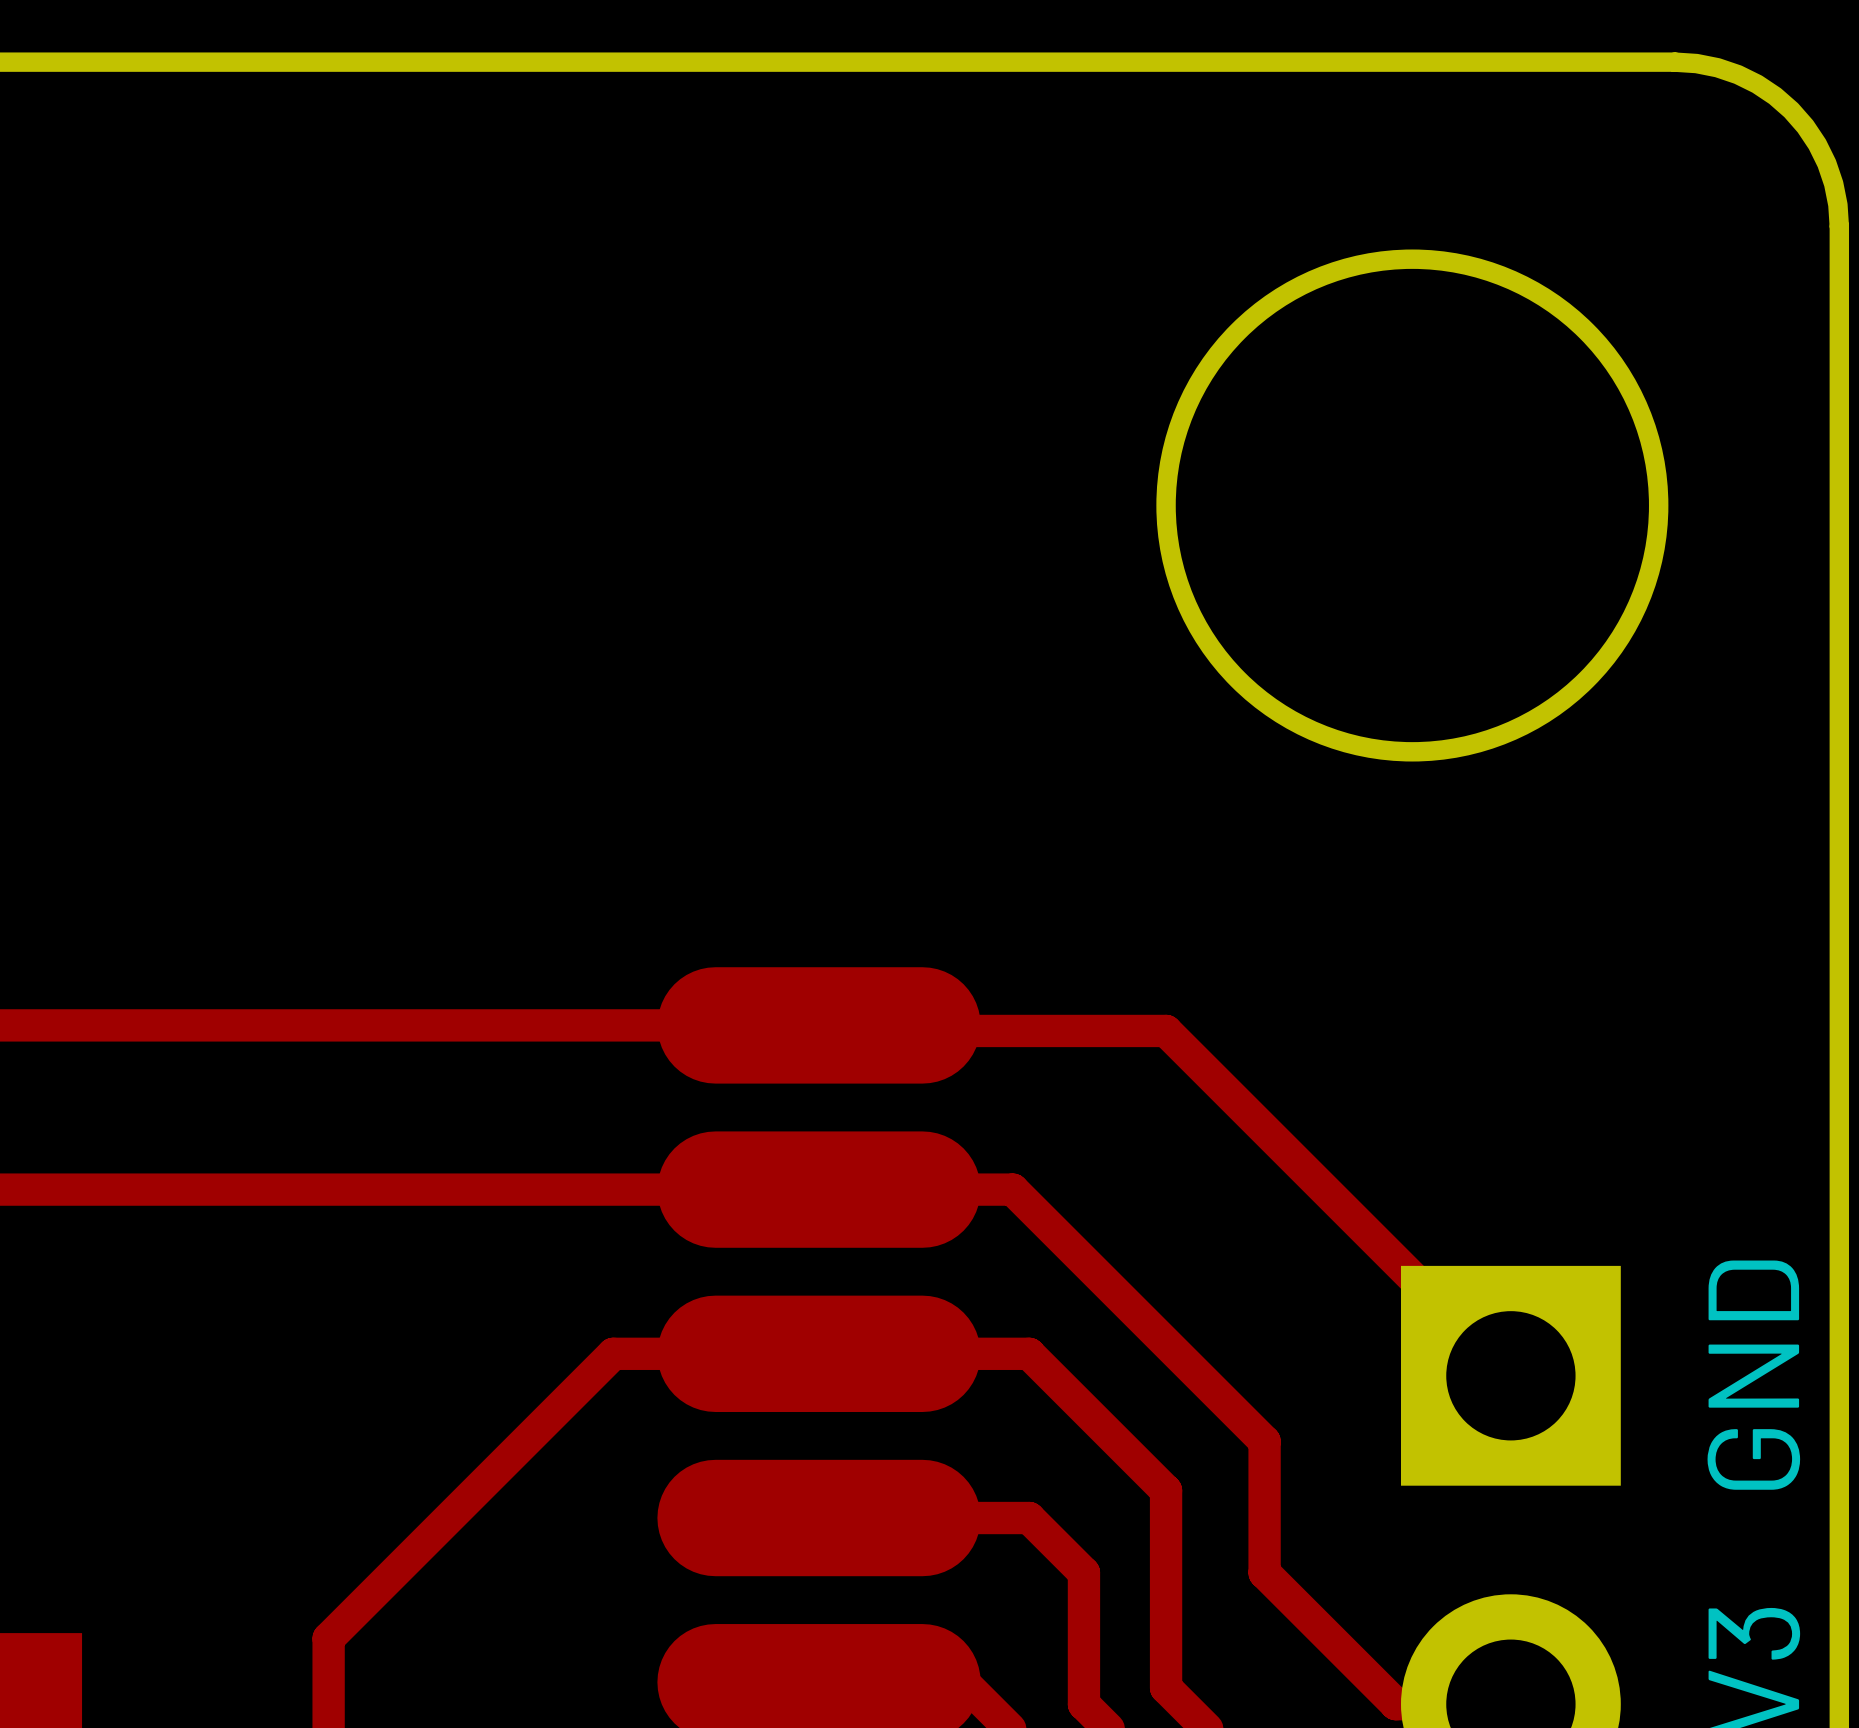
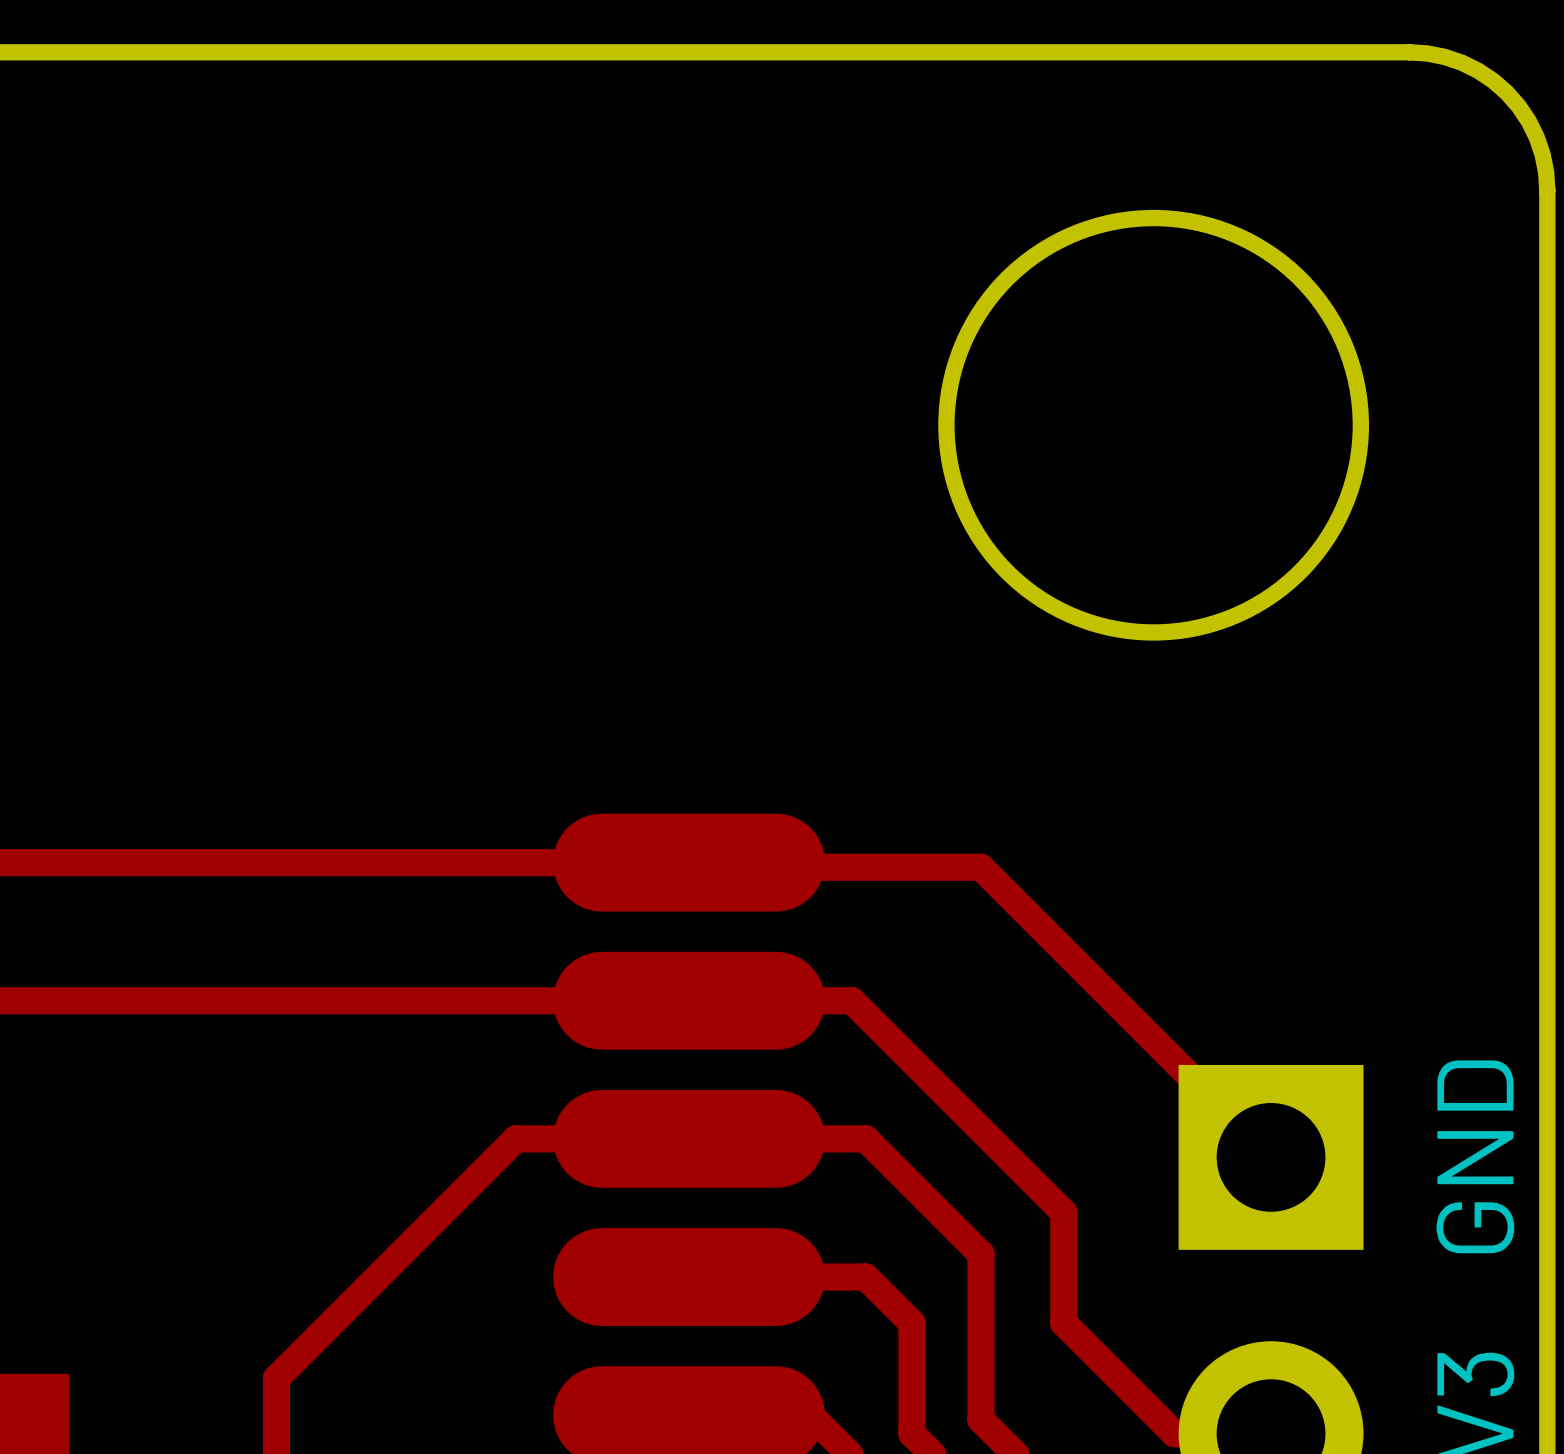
round board edge position: (1412, 505) -> (1153, 425)

